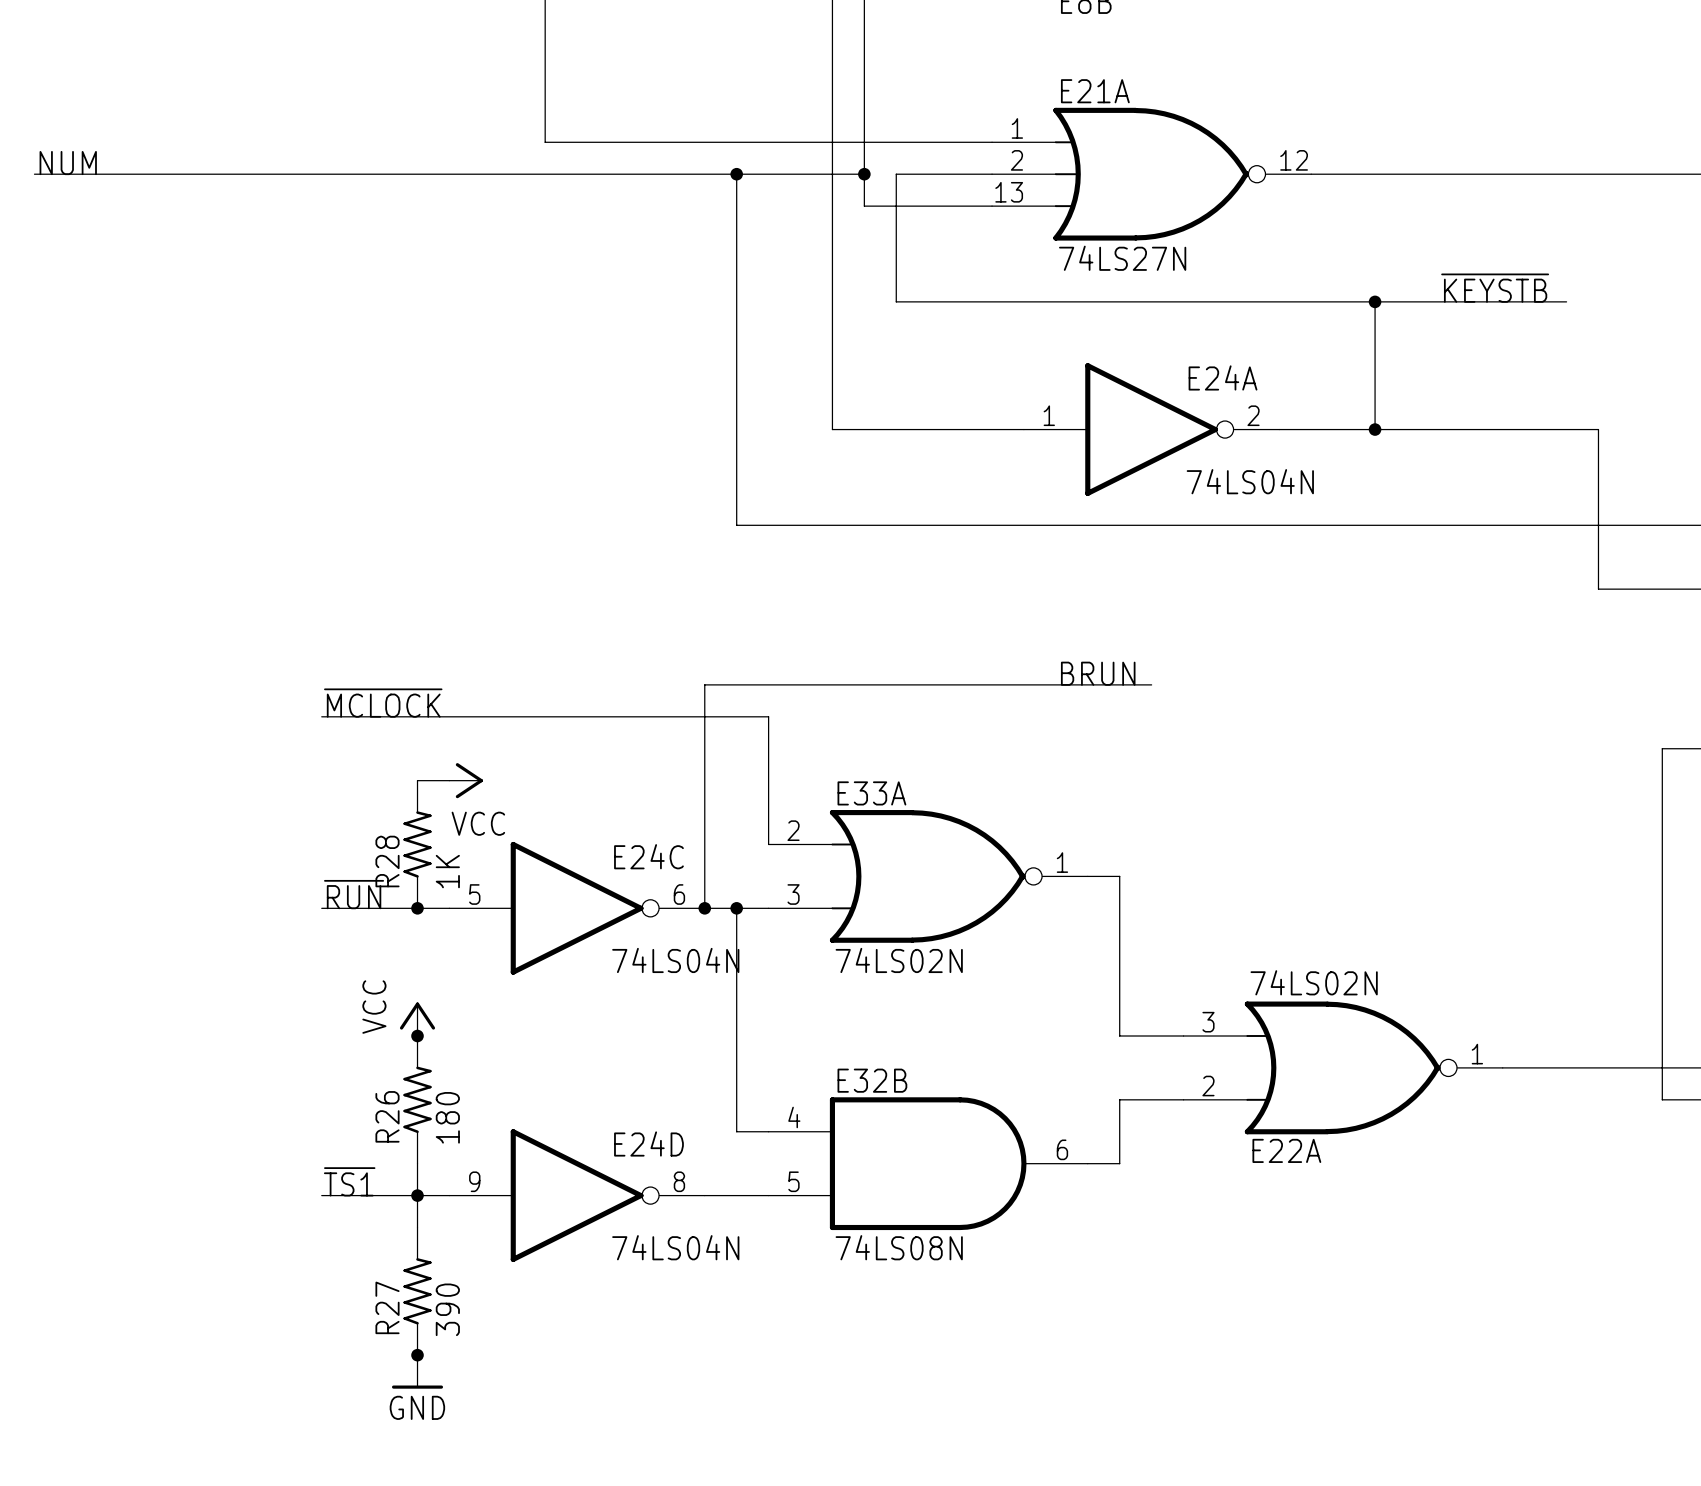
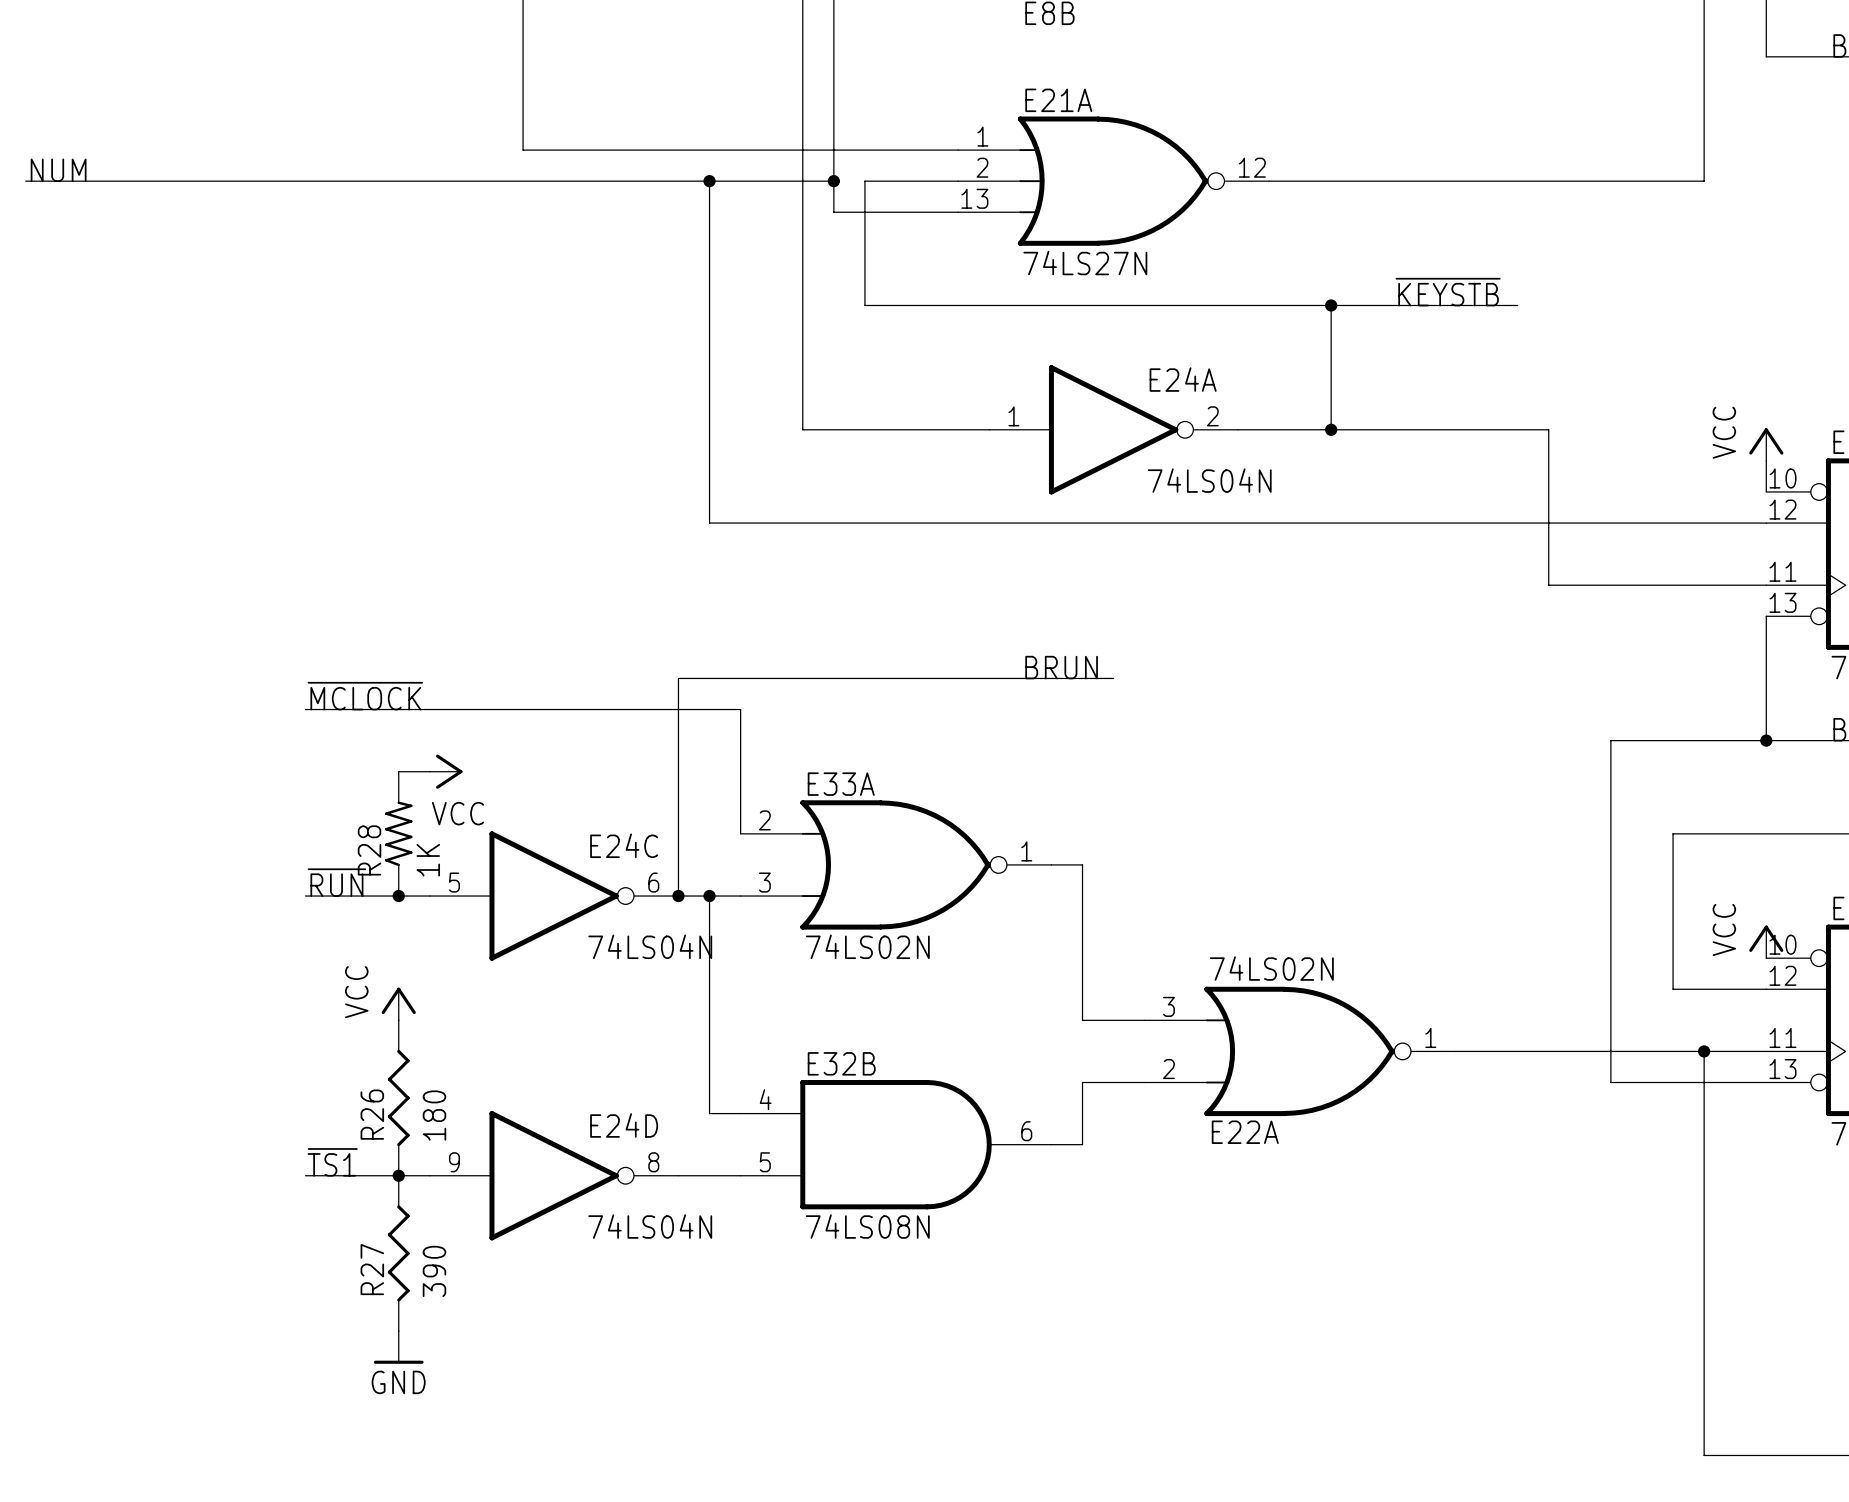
R26 symbol: [403, 1036, 432, 1164] -> [387, 1020, 410, 1176]
junction: (417, 1036) -> none
R27 symbol: [403, 1227, 432, 1356] -> [387, 1175, 410, 1332]
junction: (417, 1355) -> none

